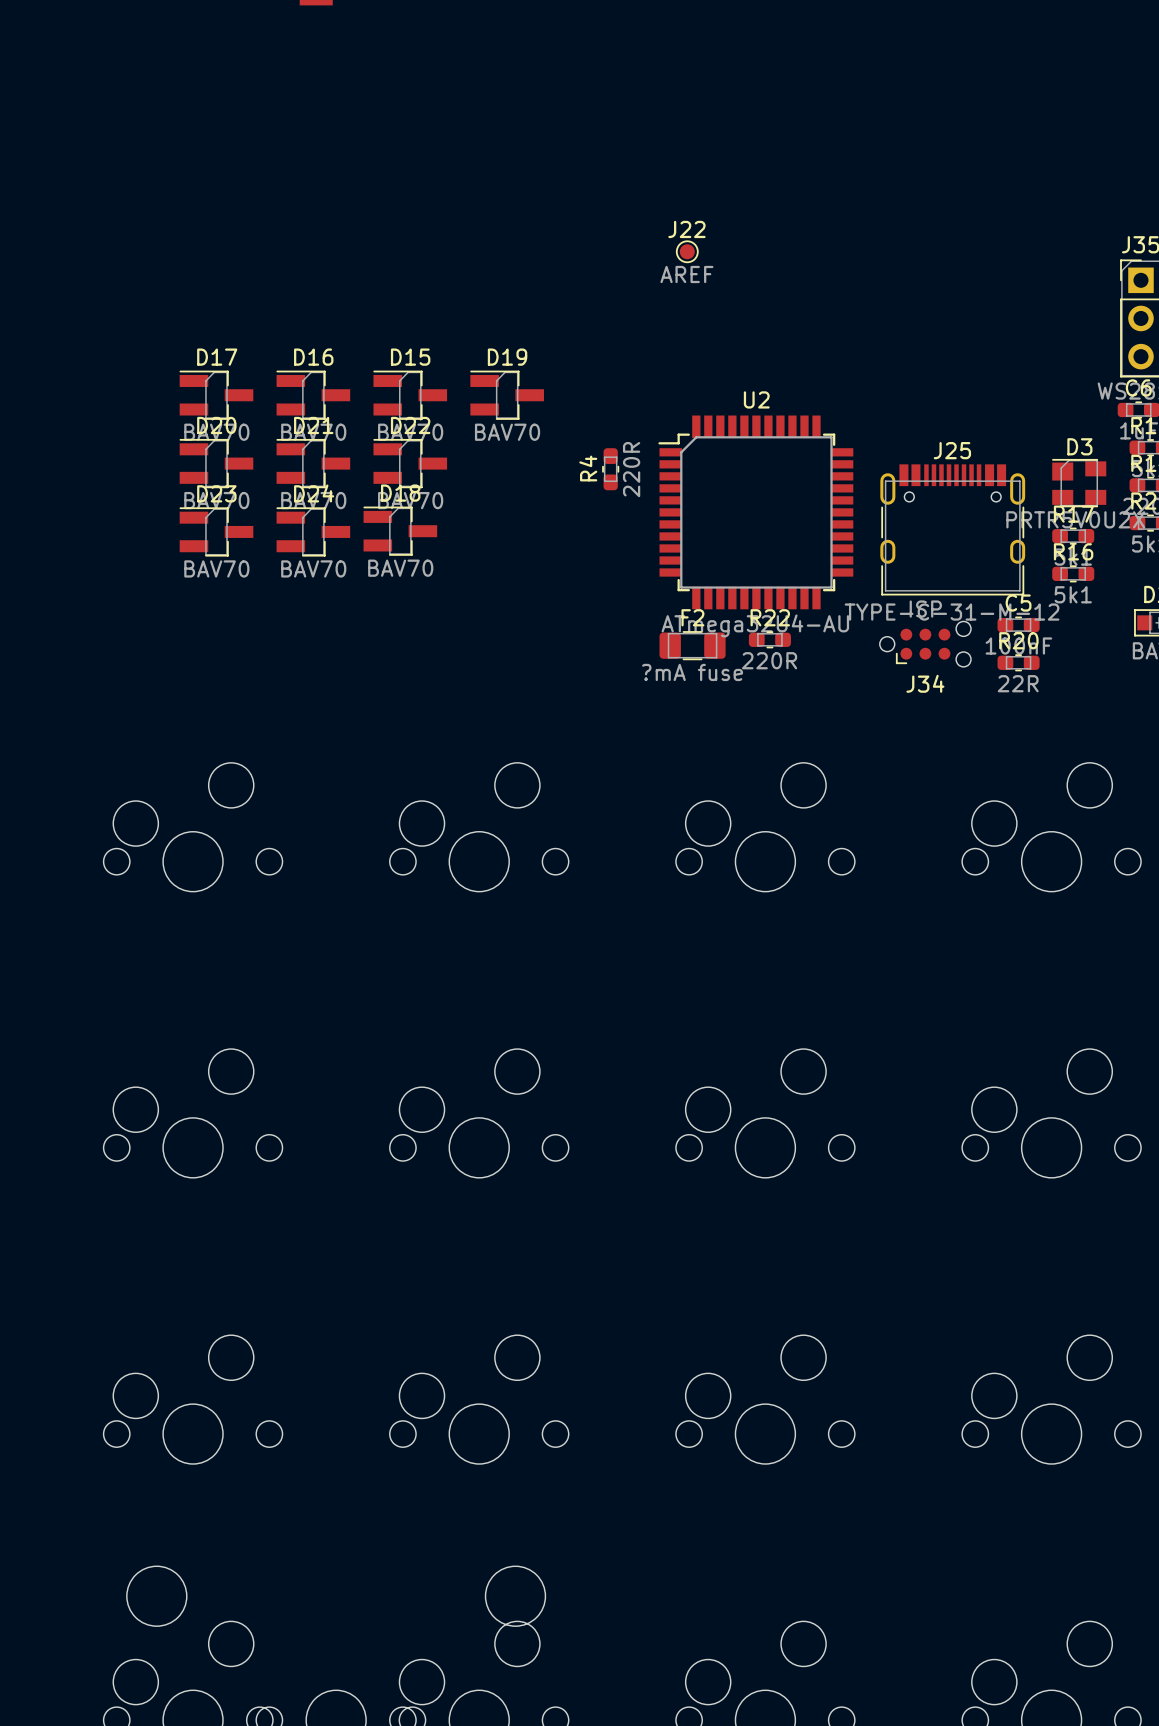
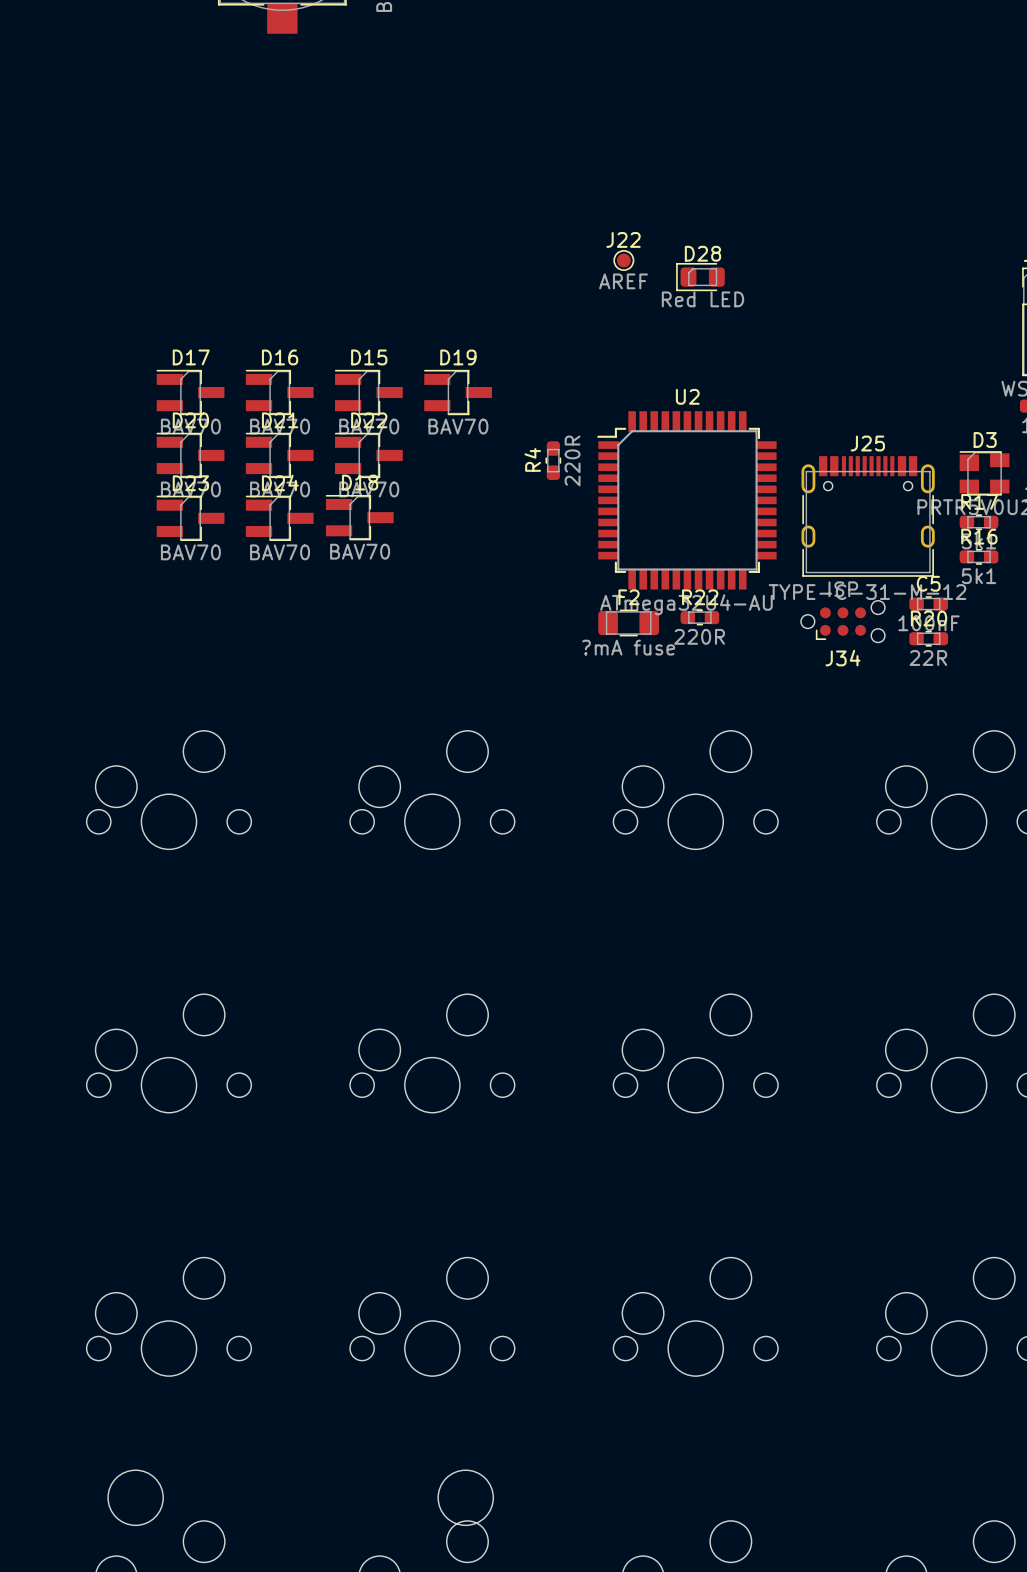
D28: none -> Red LED (700, 277)

